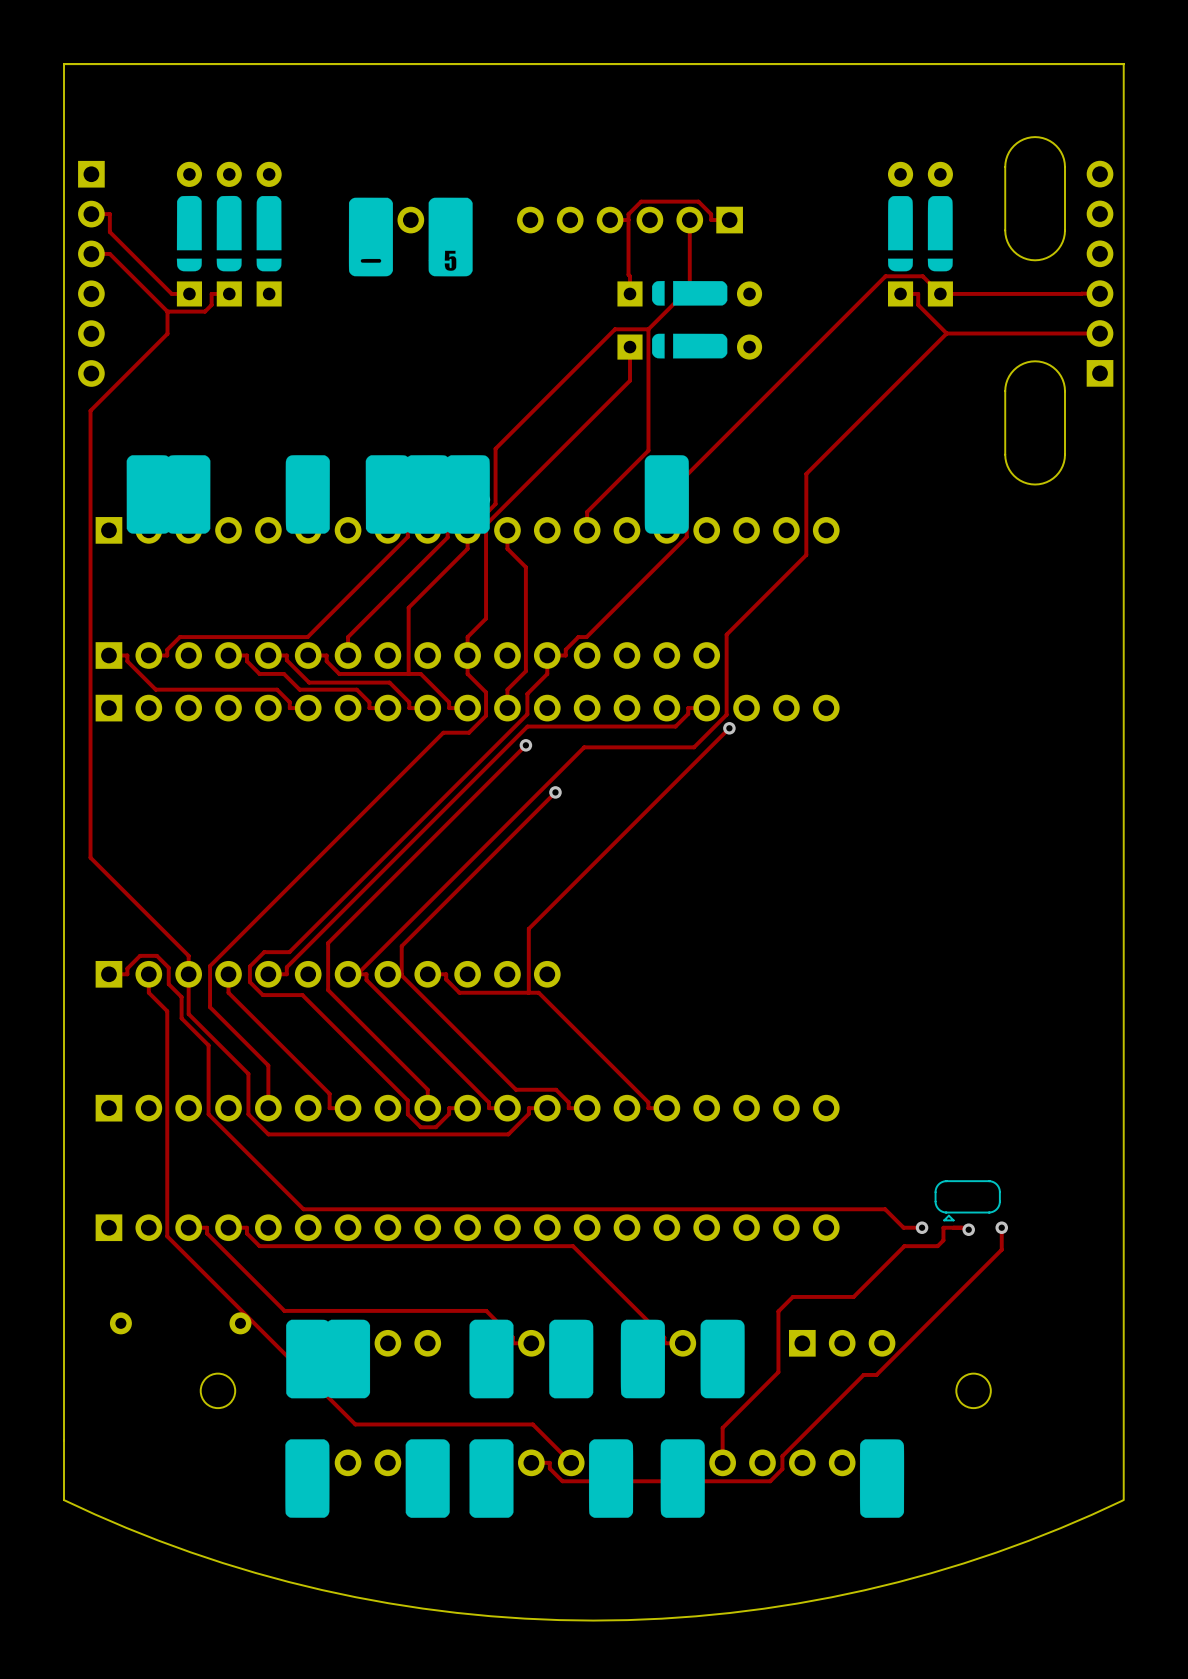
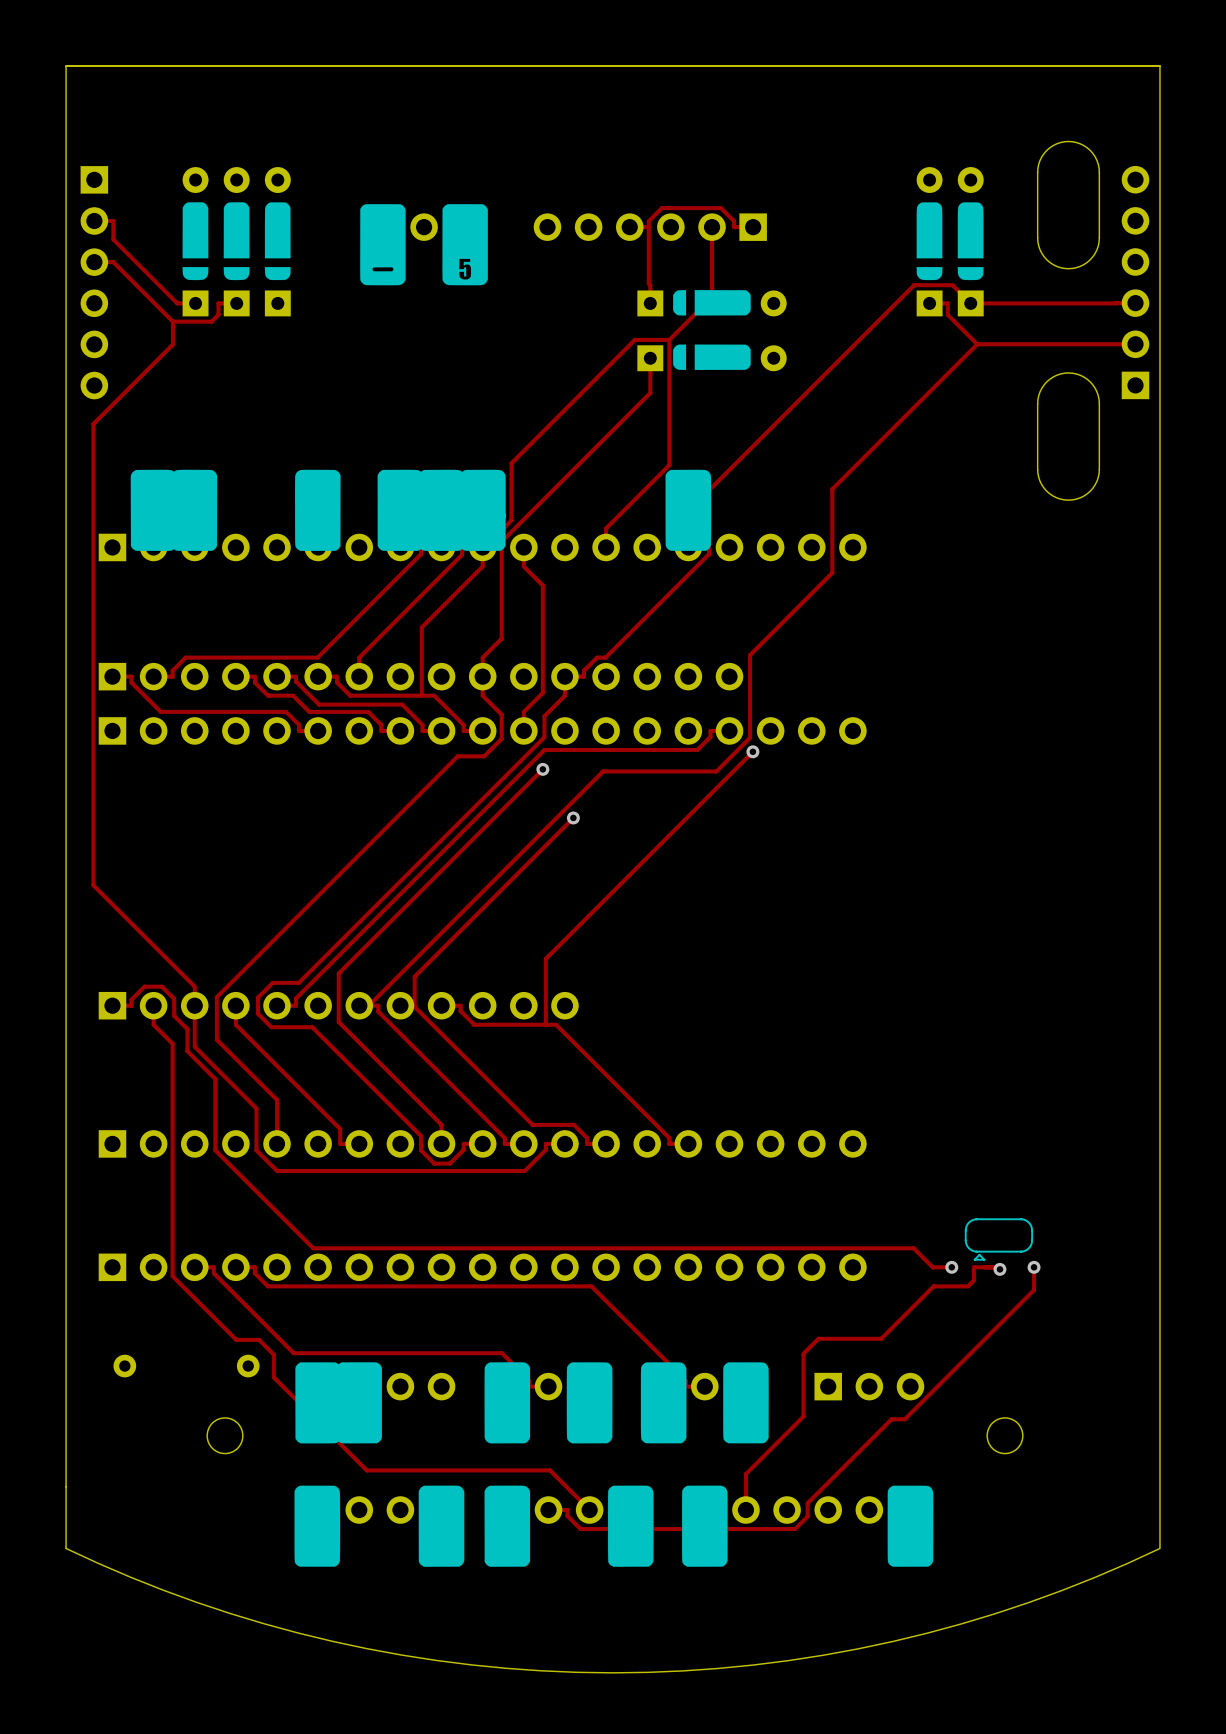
track: (228, 1298) (265, 1334) -> (236, 1339) (259, 1339) (273, 1354) (273, 1377)

